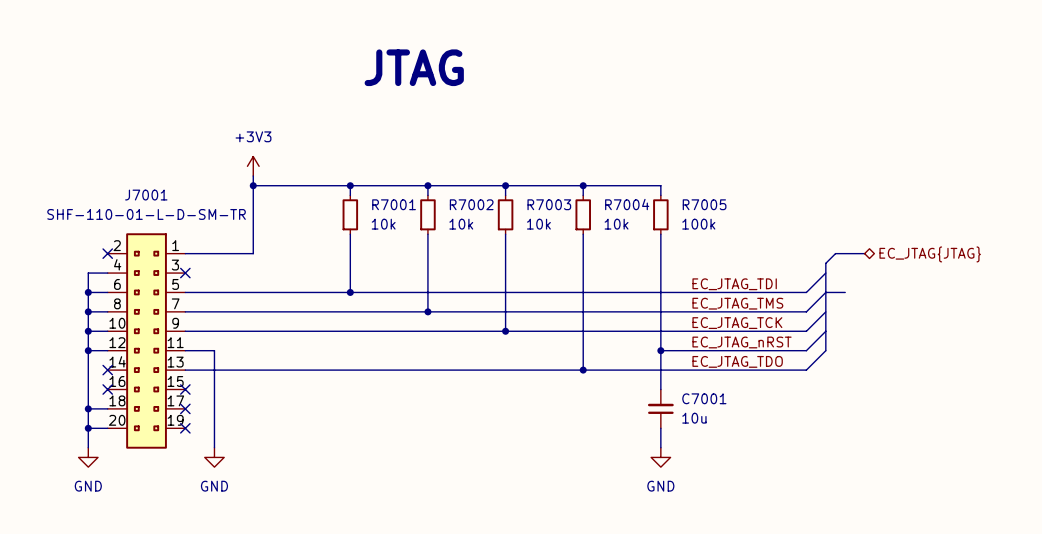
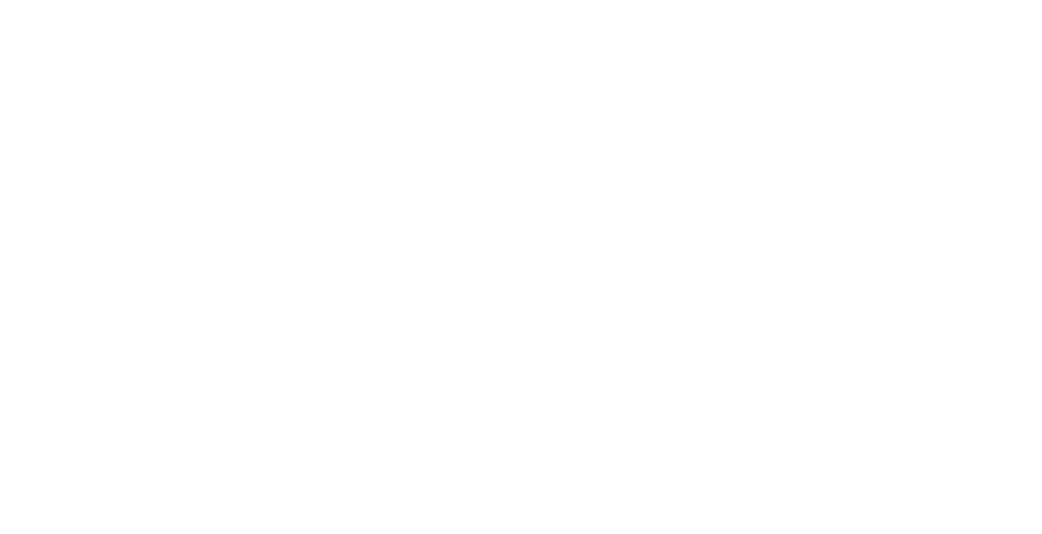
text: JTAG (414, 67) -> none
power symbol: +3V3 (253, 166) -> none
wire: (253, 176) (253, 253) (185, 253) -> none
wire: (253, 185) (660, 185) (660, 195) -> none
junction: (253, 185) -> none
wire: (350, 185) (350, 195) -> none
junction: (350, 185) -> none
wire: (427, 185) (427, 195) -> none
junction: (427, 185) -> none
wire: (505, 185) (505, 195) -> none
junction: (505, 185) -> none
wire: (583, 185) (583, 195) -> none
junction: (583, 185) -> none
R7001: (350, 214) -> none
R7002: (427, 214) -> none
R7003: (505, 214) -> none
R7004: (583, 214) -> none
R7005: (660, 214) -> none
wire: (350, 234) (350, 292) -> none
wire: (427, 234) (427, 311) -> none
wire: (505, 234) (505, 331) -> none
wire: (583, 234) (583, 370) -> none
wire: (660, 234) (660, 389) -> none
no-connect mark: (107, 253) -> none
bus: (864, 253) (835, 253) (825, 263) (825, 350) -> none
hierarchical label: EC_JTAG{JTAG} (930, 254) -> none
wire: (107, 273) (88, 273) (88, 447) -> none
no-connect mark: (185, 273) -> none
wire: (825, 273) (806, 292) (185, 292) -> none
label: EC_JTAG_TDI (734, 284) -> none
wire: (88, 292) (107, 292) -> none
junction: (88, 292) -> none
junction: (350, 292) -> none
wire: (825, 292) (806, 311) (185, 311) -> none
bus: (825, 292) (845, 292) -> none
label: EC_JTAG_TMS (737, 303) -> none
wire: (88, 311) (107, 311) -> none
junction: (88, 311) -> none
junction: (427, 311) -> none
wire: (825, 311) (806, 331) (185, 331) -> none
label: EC_JTAG_TCK (737, 323) -> none
wire: (88, 331) (107, 331) -> none
junction: (88, 331) -> none
junction: (505, 331) -> none
wire: (825, 331) (806, 350) (660, 350) -> none
J7001: (146, 340) -> none
label: EC_JTAG_nRST (742, 342) -> none
wire: (88, 350) (107, 350) -> none
junction: (88, 350) -> none
wire: (185, 350) (214, 350) (214, 447) -> none
junction: (660, 350) -> none
wire: (825, 350) (806, 370) (185, 370) -> none
label: EC_JTAG_TDO (737, 361) -> none
no-connect mark: (107, 370) -> none
junction: (583, 370) -> none
no-connect mark: (107, 389) -> none
no-connect mark: (185, 389) -> none
wire: (88, 408) (107, 408) -> none
junction: (88, 408) -> none
no-connect mark: (185, 408) -> none
C7001: (660, 408) -> none
wire: (88, 428) (107, 428) -> none
junction: (88, 428) -> none
no-connect mark: (185, 428) -> none
wire: (660, 428) (660, 447) -> none
power symbol: GND (88, 457) -> none
power symbol: GND (214, 457) -> none
power symbol: GND (660, 457) -> none

